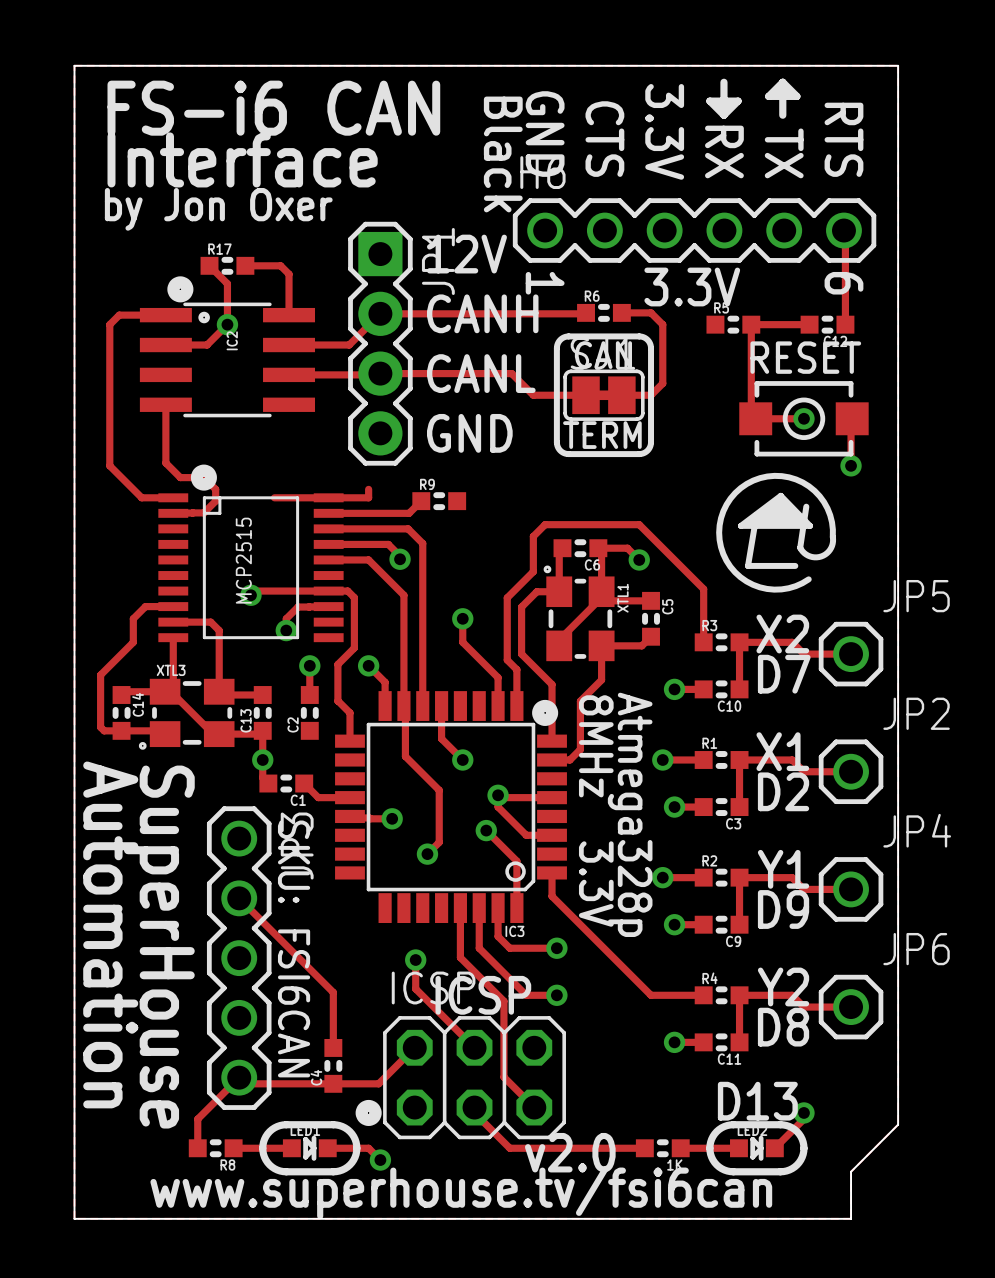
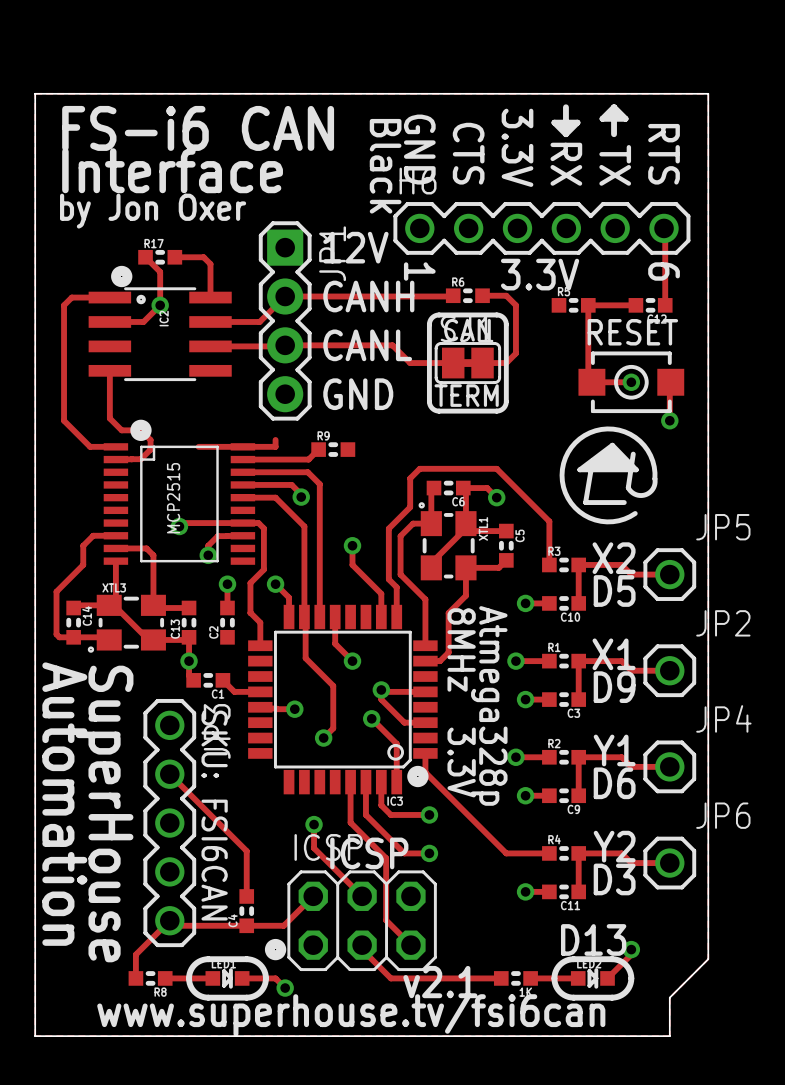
text: D7 (784, 674) -> D5 (614, 590)
drawing position: (545, 712) -> (417, 776)
text: D2 (783, 791) -> D9 (614, 687)
text: D9 (783, 909) -> D6 (614, 783)
text: D8 (783, 1027) -> D3 (614, 879)
text: v2.0 (570, 1152) -> v2.1 (440, 982)

